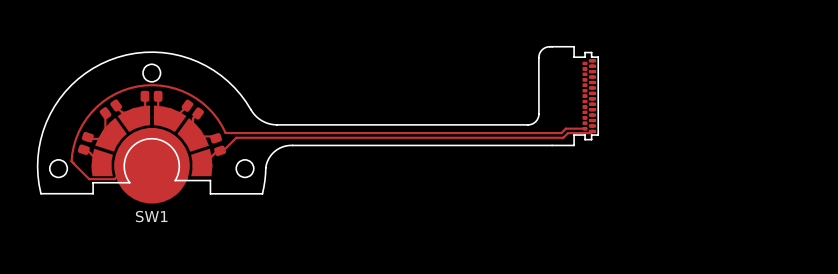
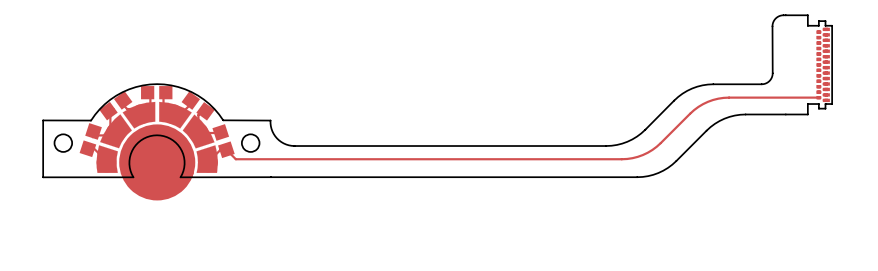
board edge: none -> (785, 15) (777, 16) (772, 23) (772, 74) (768, 81) (761, 84) (707, 84) (692, 88) (678, 96) (641, 133) (627, 141) (617, 144) (291, 145) (277, 138) (272, 131) (270, 120) (223, 120) (214, 109) (197, 95) (178, 87) (164, 84) (142, 85) (122, 92) (104, 104) (91, 120)
board edge: (552, 46) (544, 48) (539, 55) (538, 115) (536, 120) (530, 124) (270, 124) (256, 117) (234, 87) (205, 65) (171, 53) (144, 52) (109, 60) (78, 78) (54, 106) (40, 139) (37, 166) (40, 193) (93, 193) (93, 182) (129, 182) (124, 166) (127, 152) (137, 142) (150, 138) (164, 141) (174, 150) (179, 163) (175, 180) (210, 180) (210, 193) (262, 193) -> none
round board edge: [142, 63, 162, 83] -> none
part footprint: [140, 90, 163, 102] -> [141, 86, 173, 100]
part position: (575, 96) -> (808, 64)
part footprint: [99, 99, 123, 120] -> [99, 91, 133, 121]
part footprint: [181, 99, 205, 120] -> [181, 91, 215, 121]
board edge: none -> (785, 114) (740, 114) (724, 118) (710, 127) (667, 167) (653, 174) (642, 176) (180, 177) (184, 160) (180, 147) (170, 138) (157, 135) (143, 138) (132, 150) (129, 164) (133, 177) (43, 177) (43, 120) (90, 120)
track: (585, 128) (565, 128) (561, 133) (225, 132) (213, 113) (196, 98) (167, 86) (145, 85) (122, 90) (96, 106) (82, 124) (73, 146) (71, 161) (89, 179) (114, 179) (123, 170) -> none
part footprint: [77, 131, 94, 156] -> [79, 123, 102, 158]
track: (592, 131) (590, 133) (567, 133) (563, 137) (236, 137) (223, 150) (217, 150) (215, 153) -> (818, 97) (729, 97) (713, 99) (694, 110) (652, 149) (637, 156) (627, 158) (235, 159) (226, 149) (220, 149)
part footprint: [209, 133, 227, 157] -> [212, 124, 235, 159]
board edge: (552, 145) (289, 145) (280, 147) (272, 153) (265, 167) -> none
board edge: (265, 167) (262, 193) -> none
round board edge position: (58, 168) -> (63, 143)
round board edge position: (245, 168) -> (250, 143)
SW1 name: SW1 (151, 216) -> none

